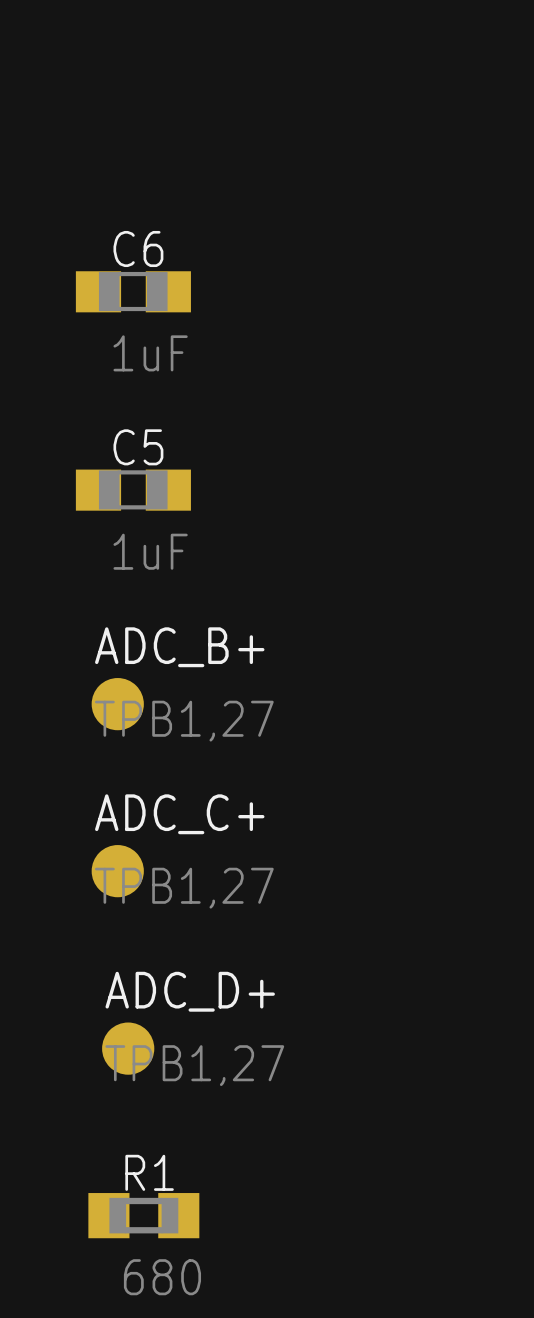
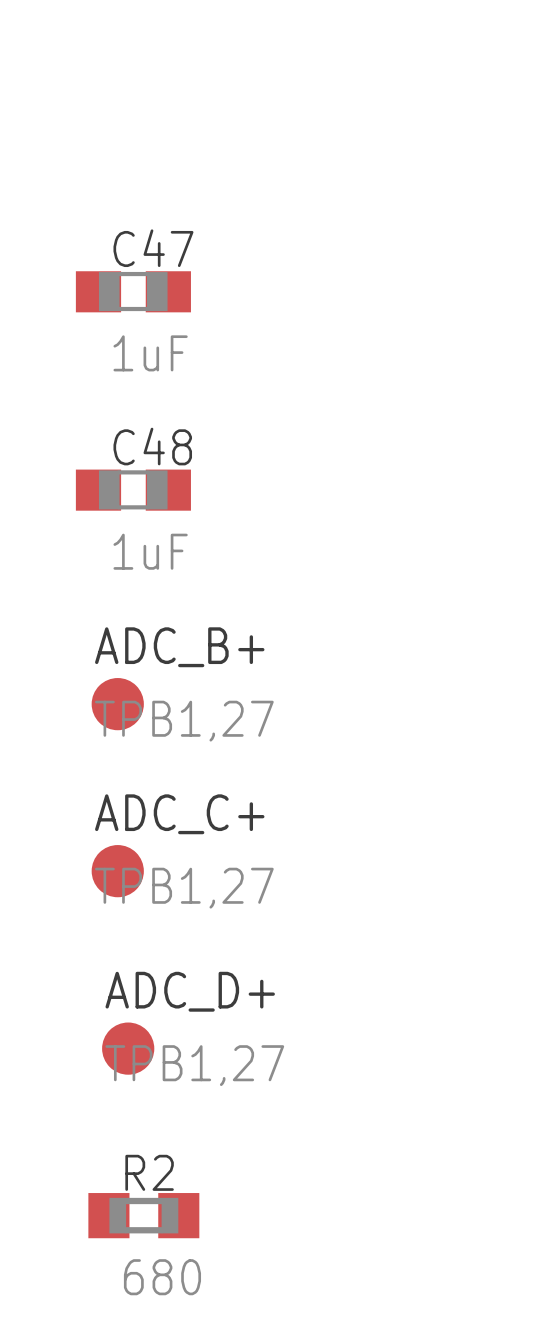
C6 name: C6 (138, 248) -> C47 (153, 248)
C5 name: C5 (138, 447) -> C48 (152, 446)
R1 name: R1 (149, 1172) -> R2 (149, 1172)

